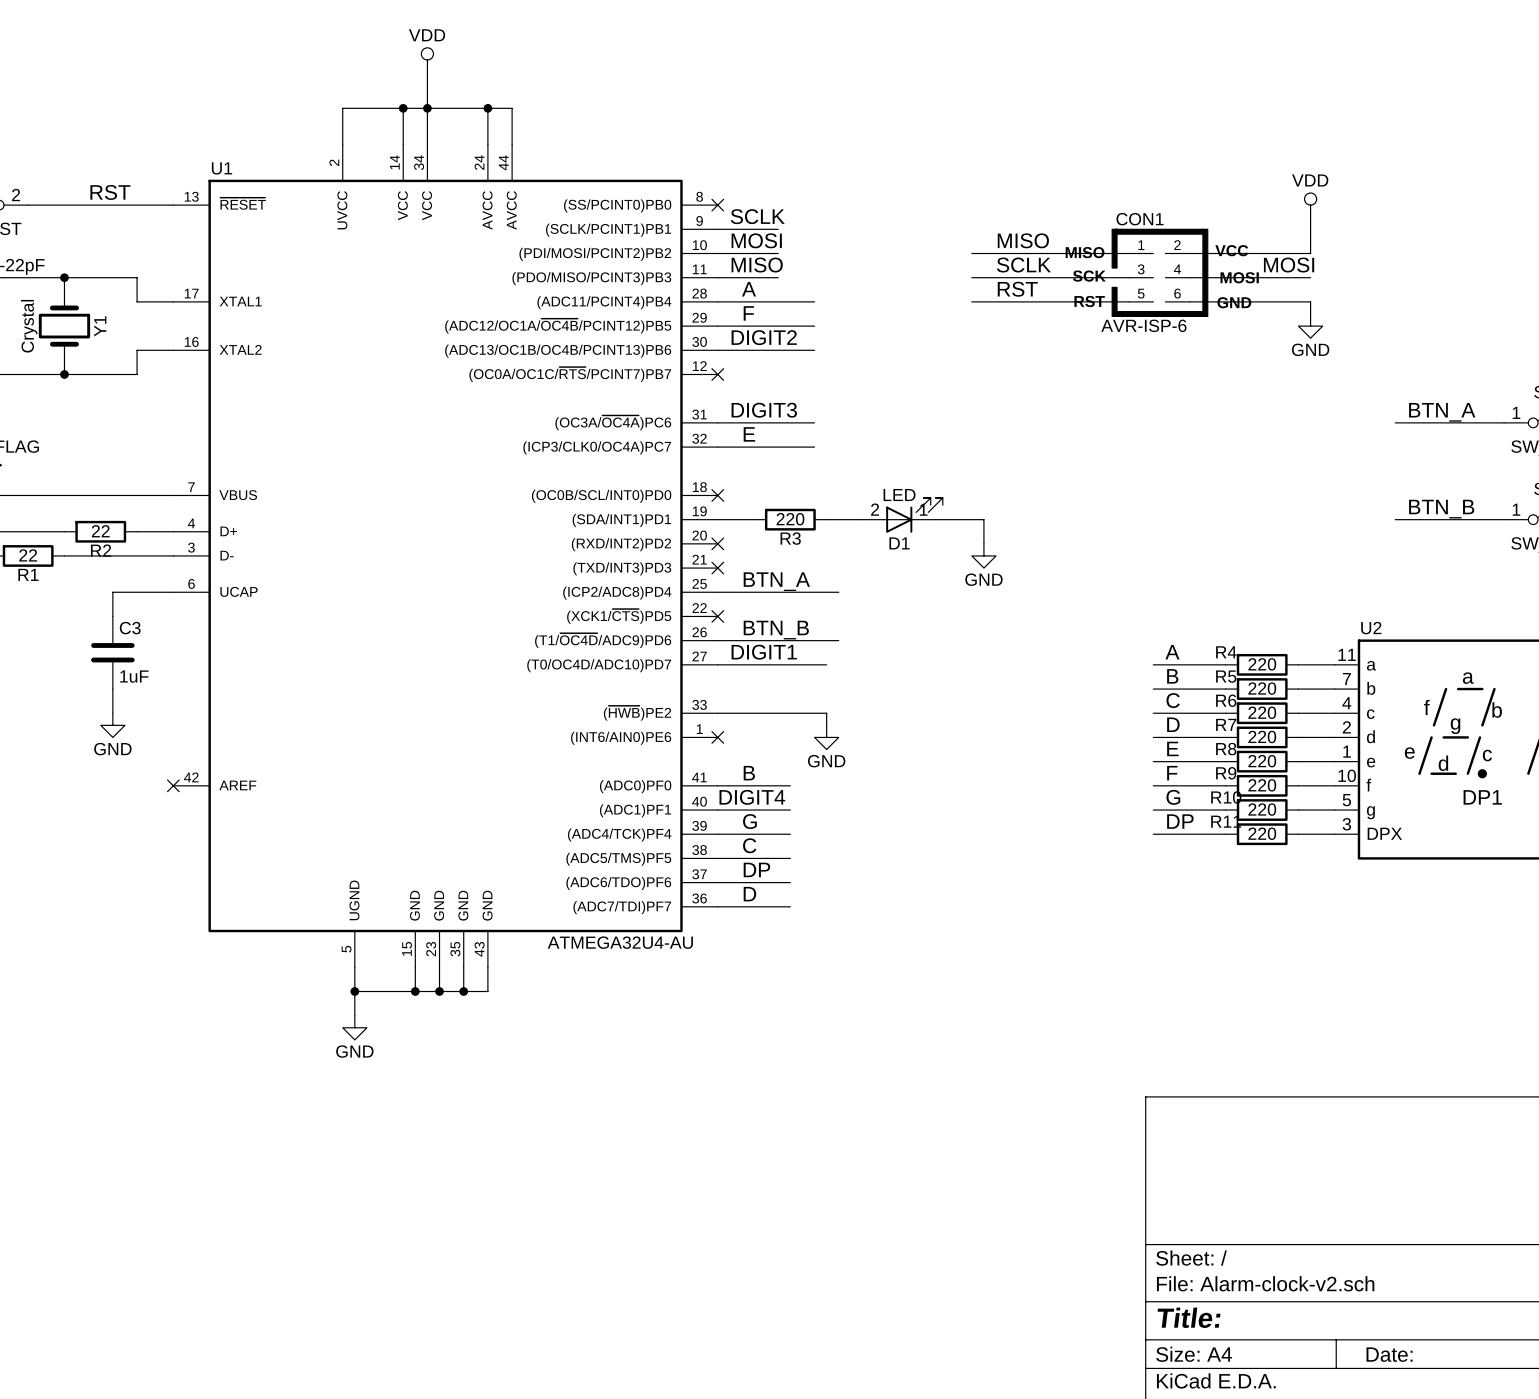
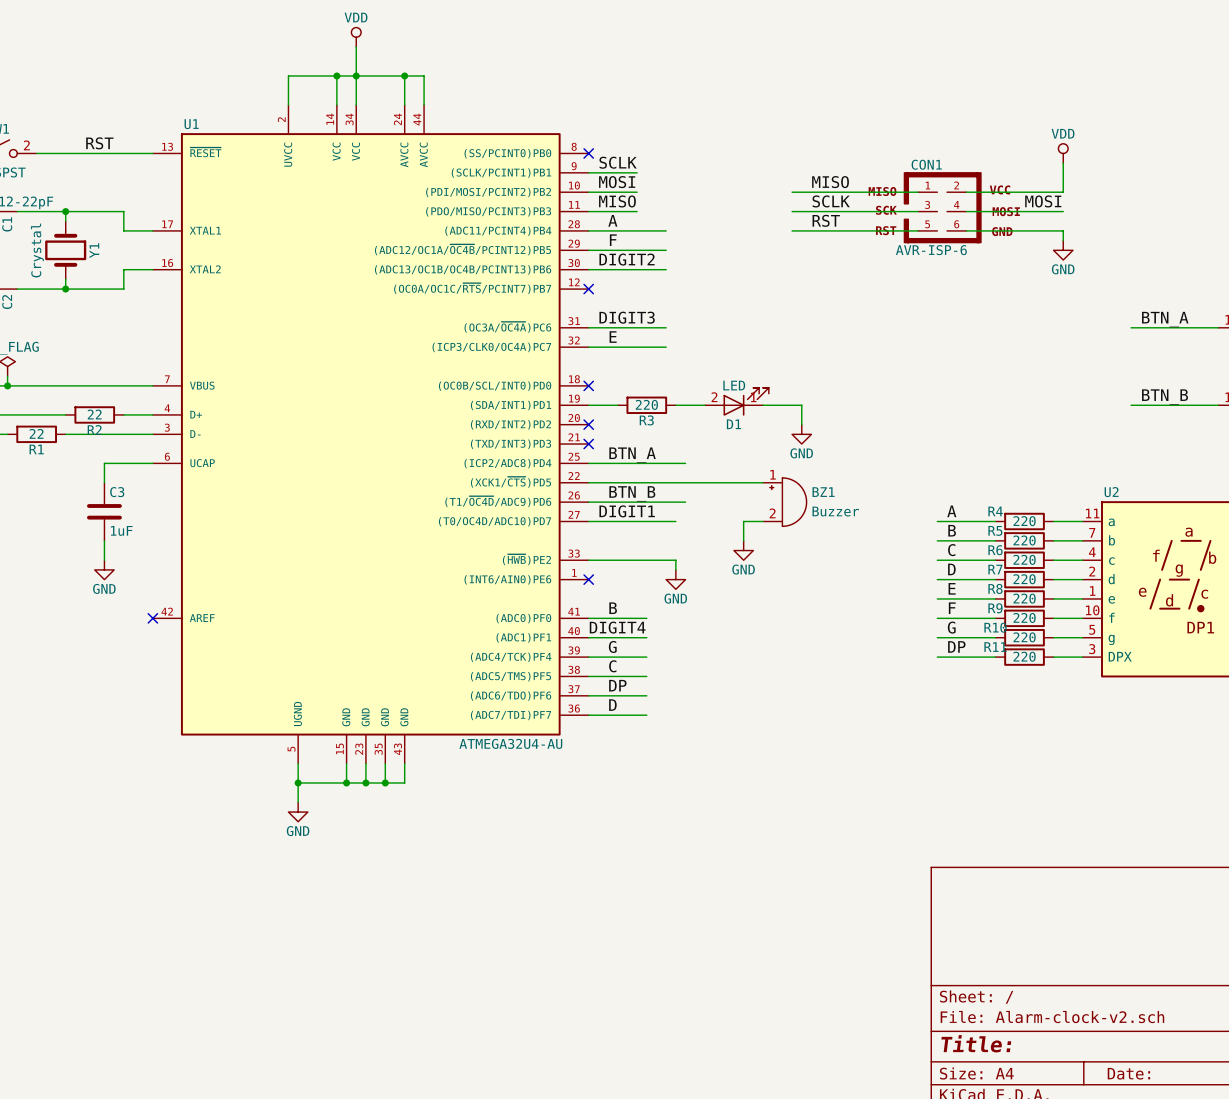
wire: none -> (588, 482) (763, 482)
no-connect mark: (717, 616) -> none
BZ1: none -> Buzzer (784, 502)
wire: none -> (763, 521) (743, 521) (743, 540)
power symbol: none -> GND (743, 550)

